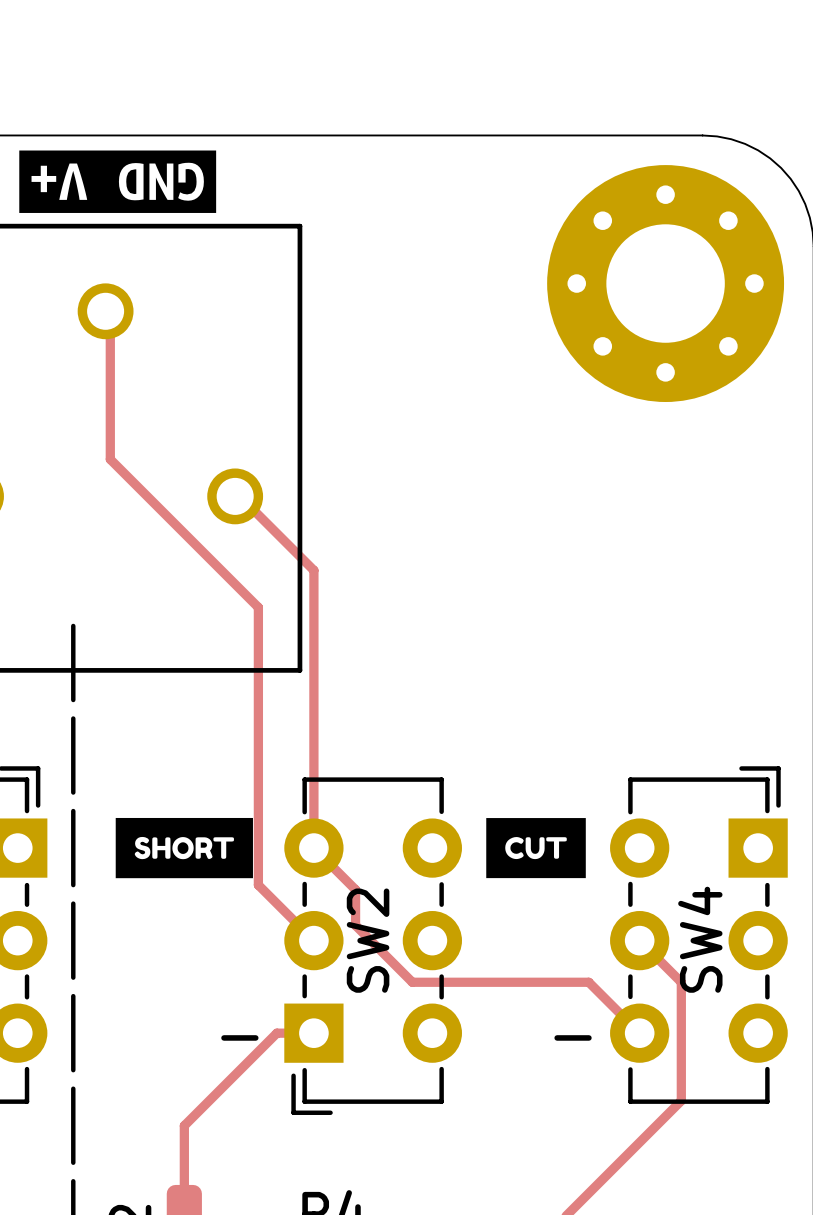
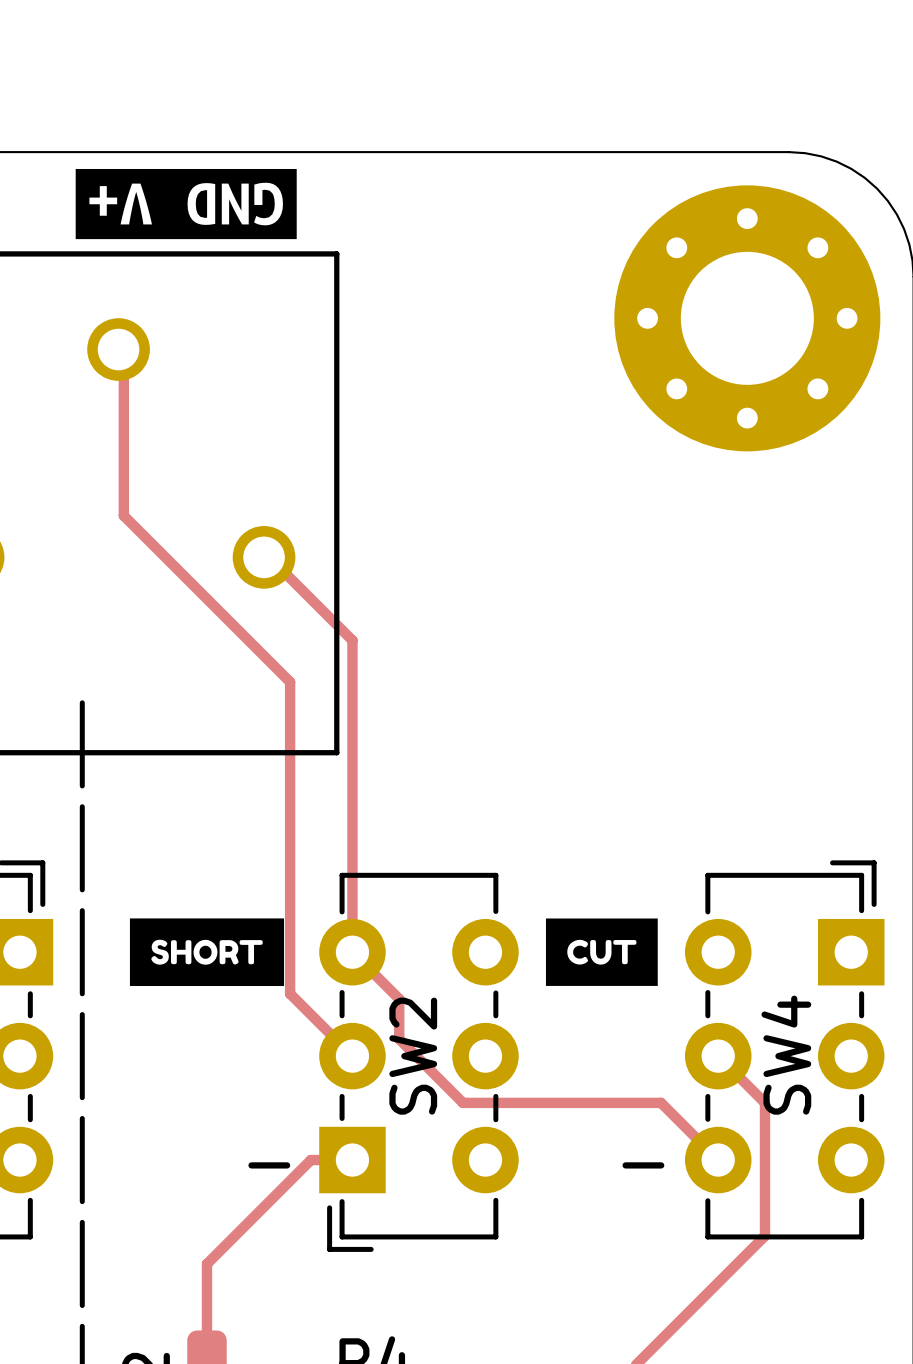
drawing position: (117, 181) -> (186, 204)

